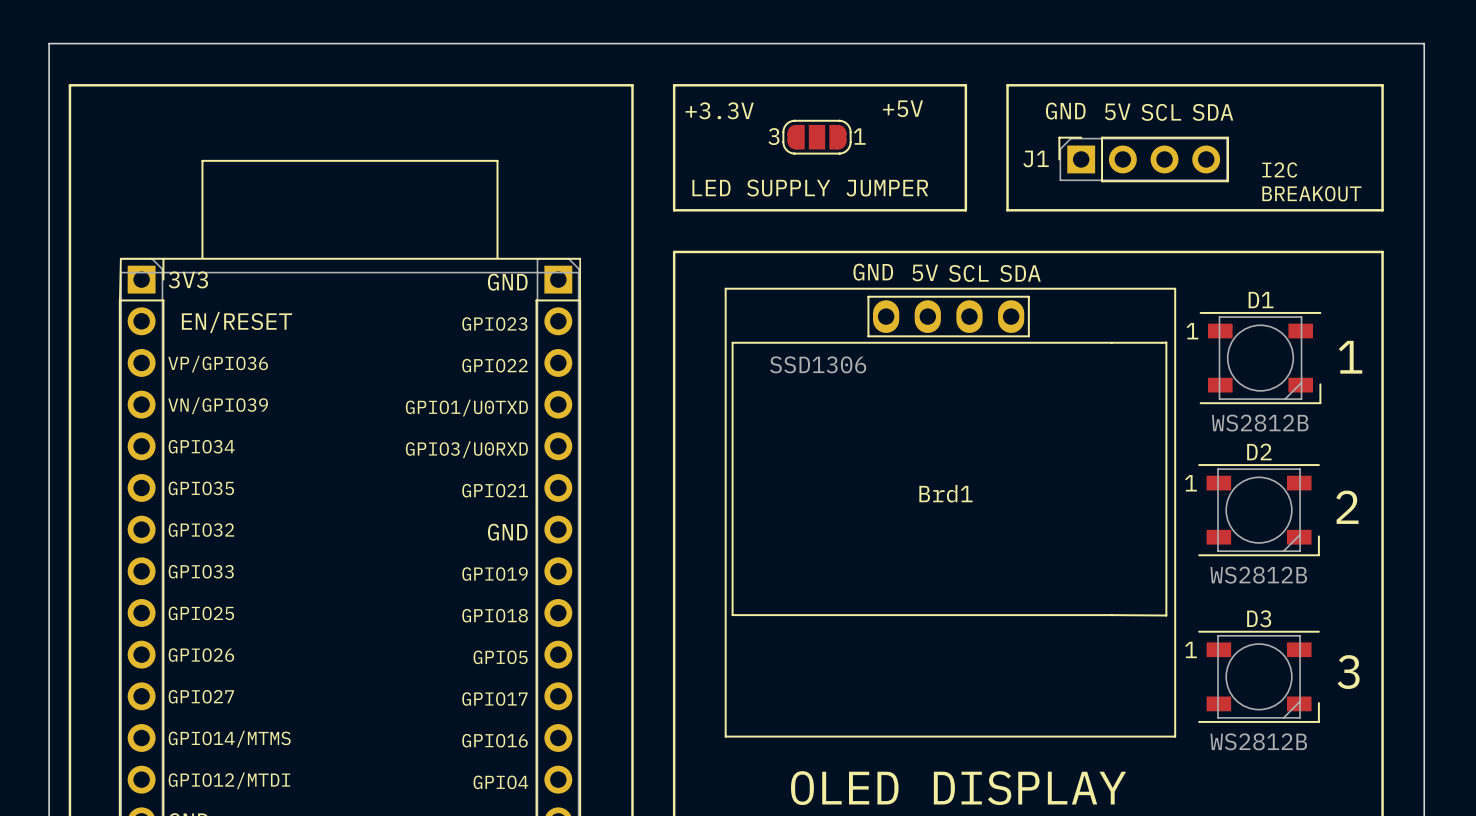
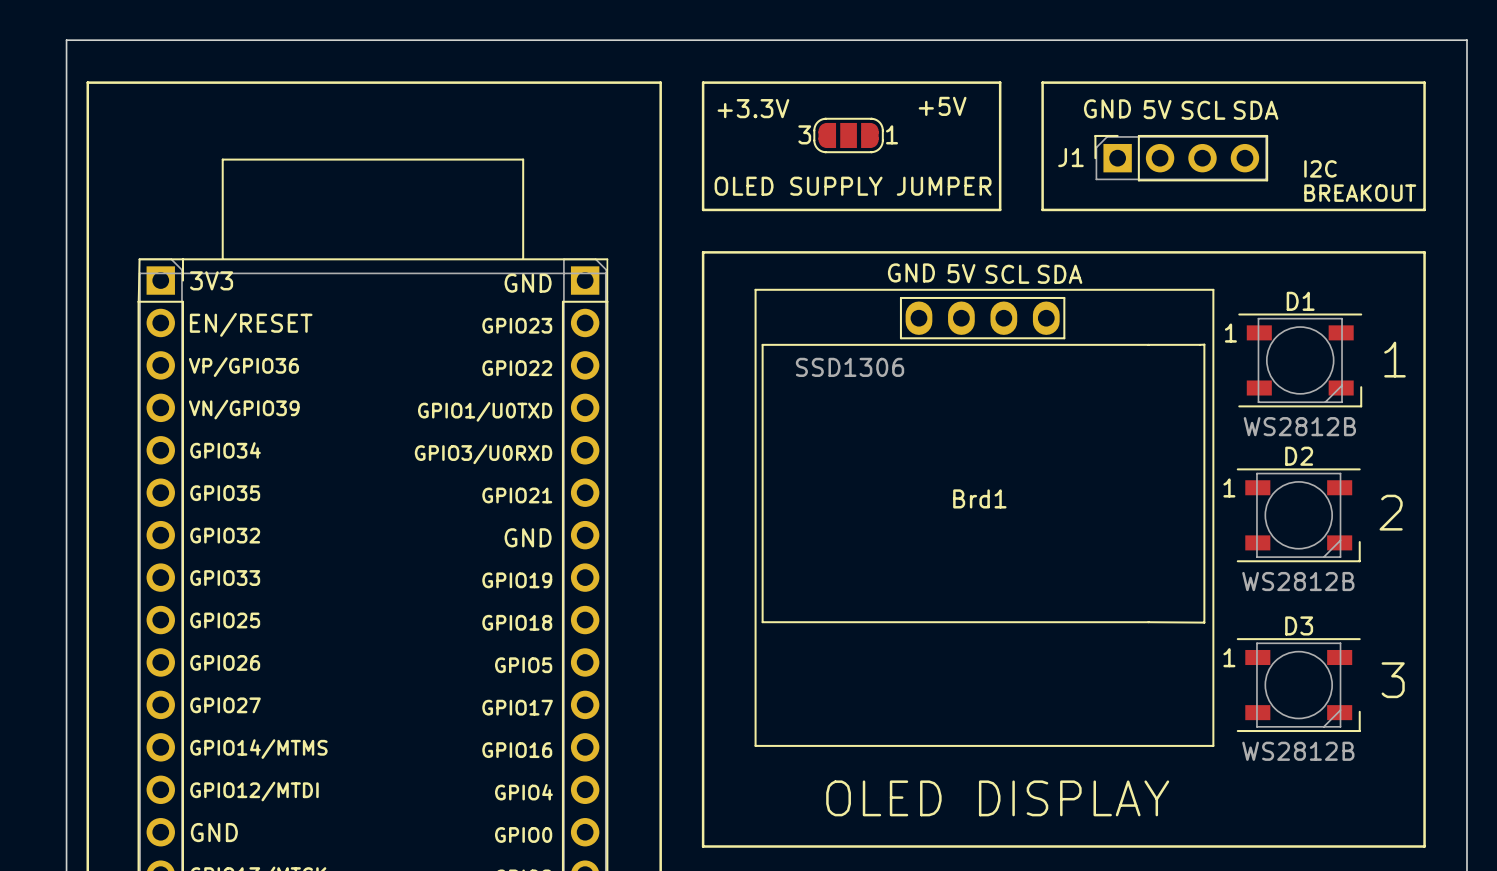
text: LED SUPPLY JUMPER (810, 188) -> OLED SUPPLY JUMPER (853, 186)

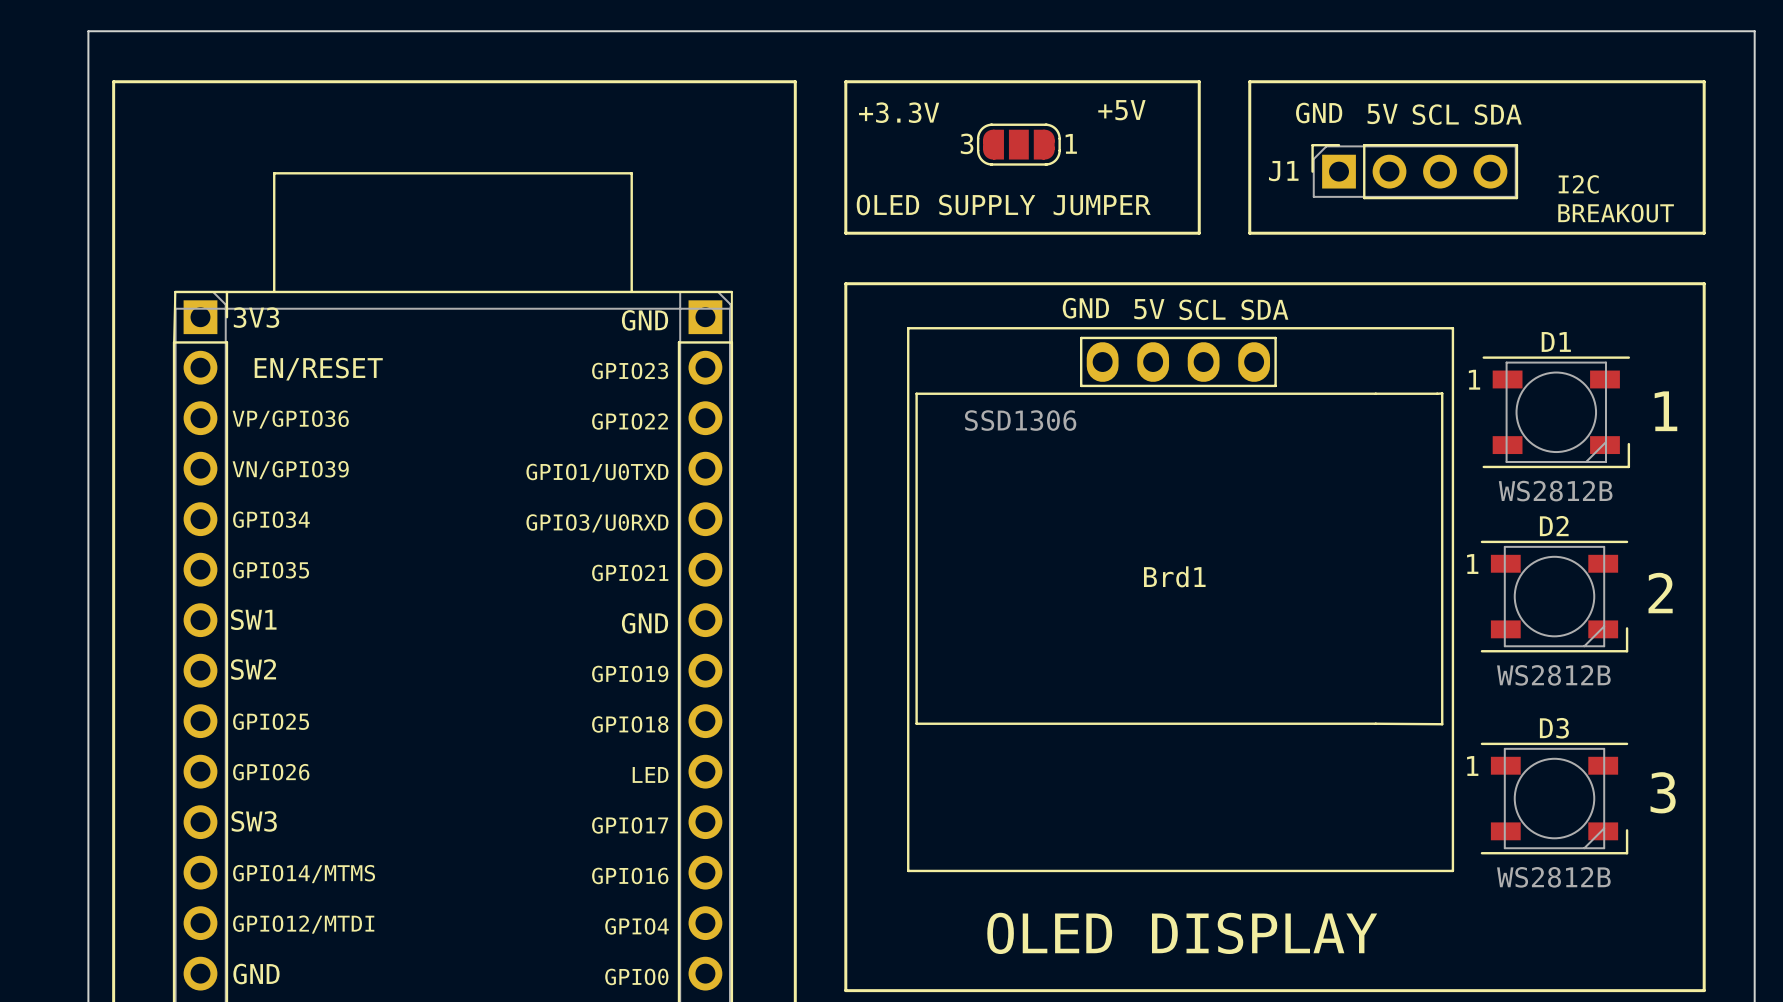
text: none -> SW1 (253, 619)
part text: GPIO32 (225, 535) -> none
text: none -> SW2 (253, 669)
part text: GPIO33 (225, 578) -> none
part text: GPIO5 (523, 665) -> LED (650, 774)
text: none -> SW3 (254, 821)
part text: GPIO27 (225, 705) -> none

